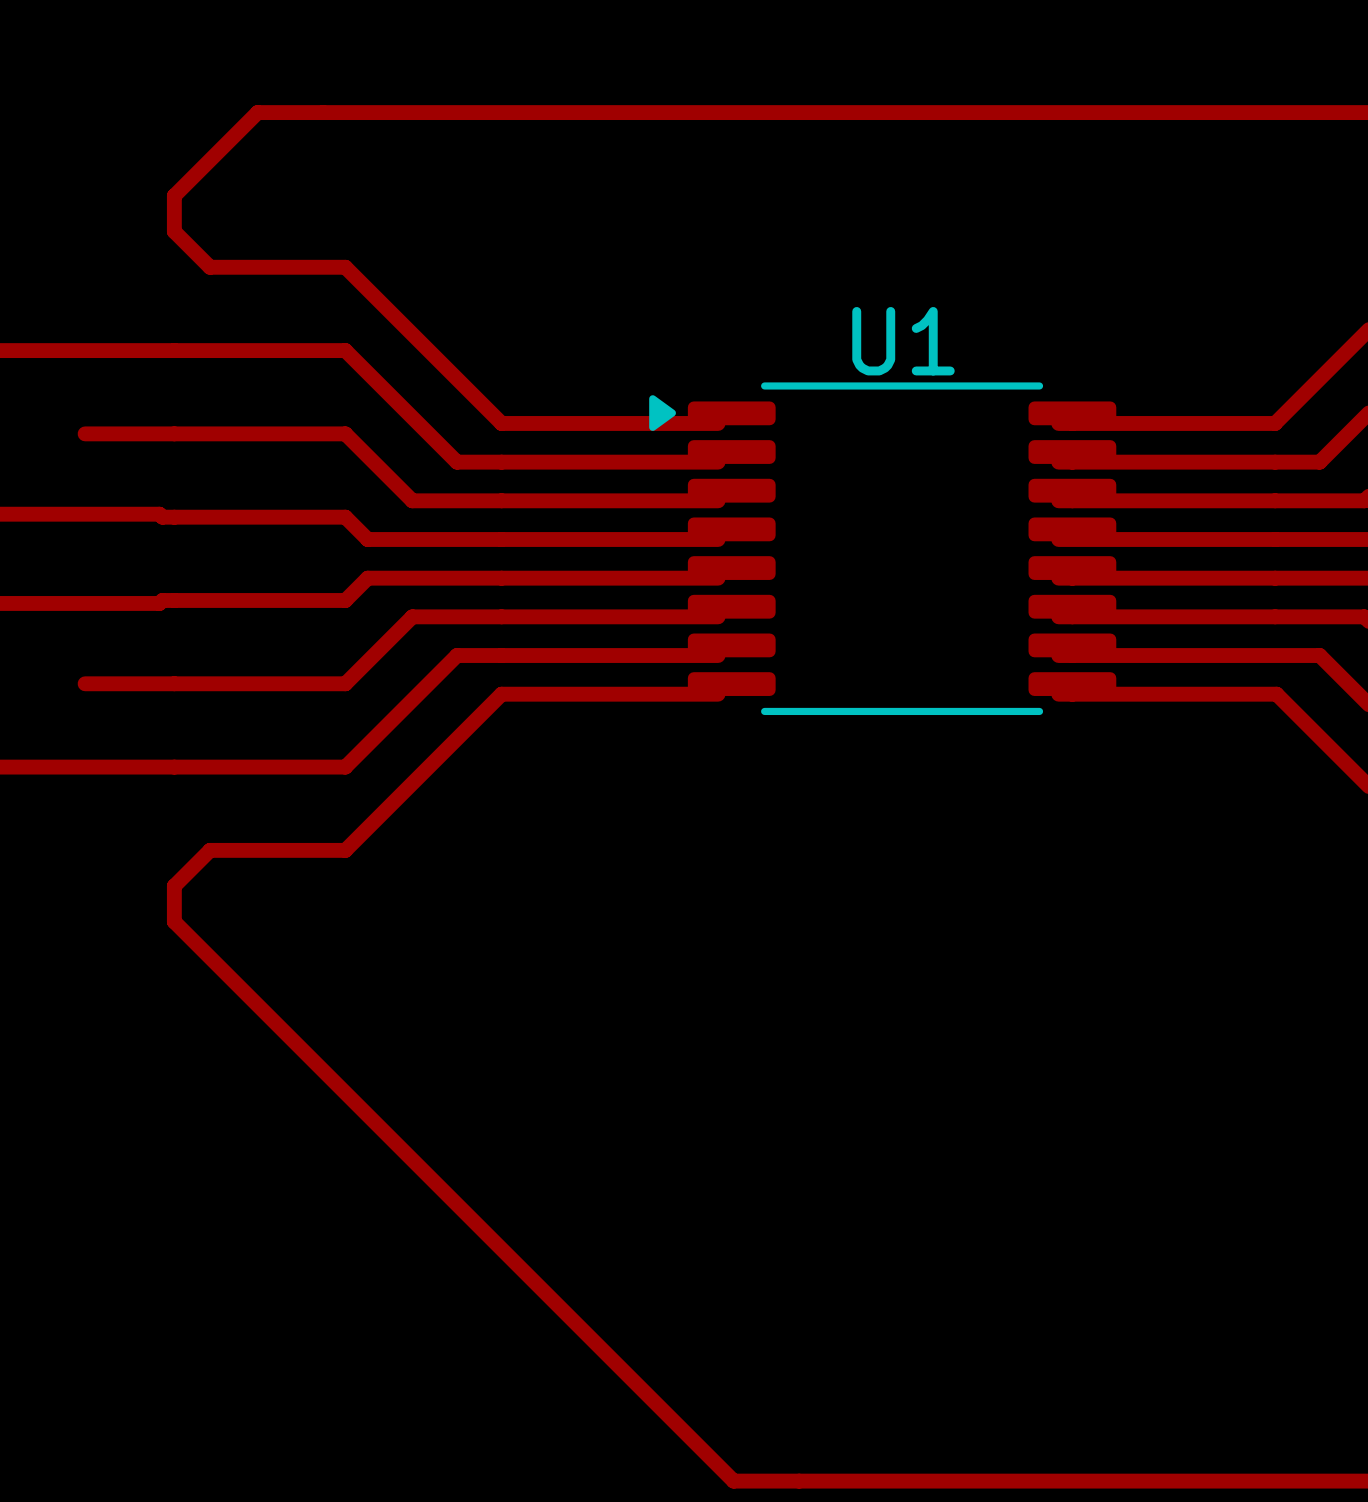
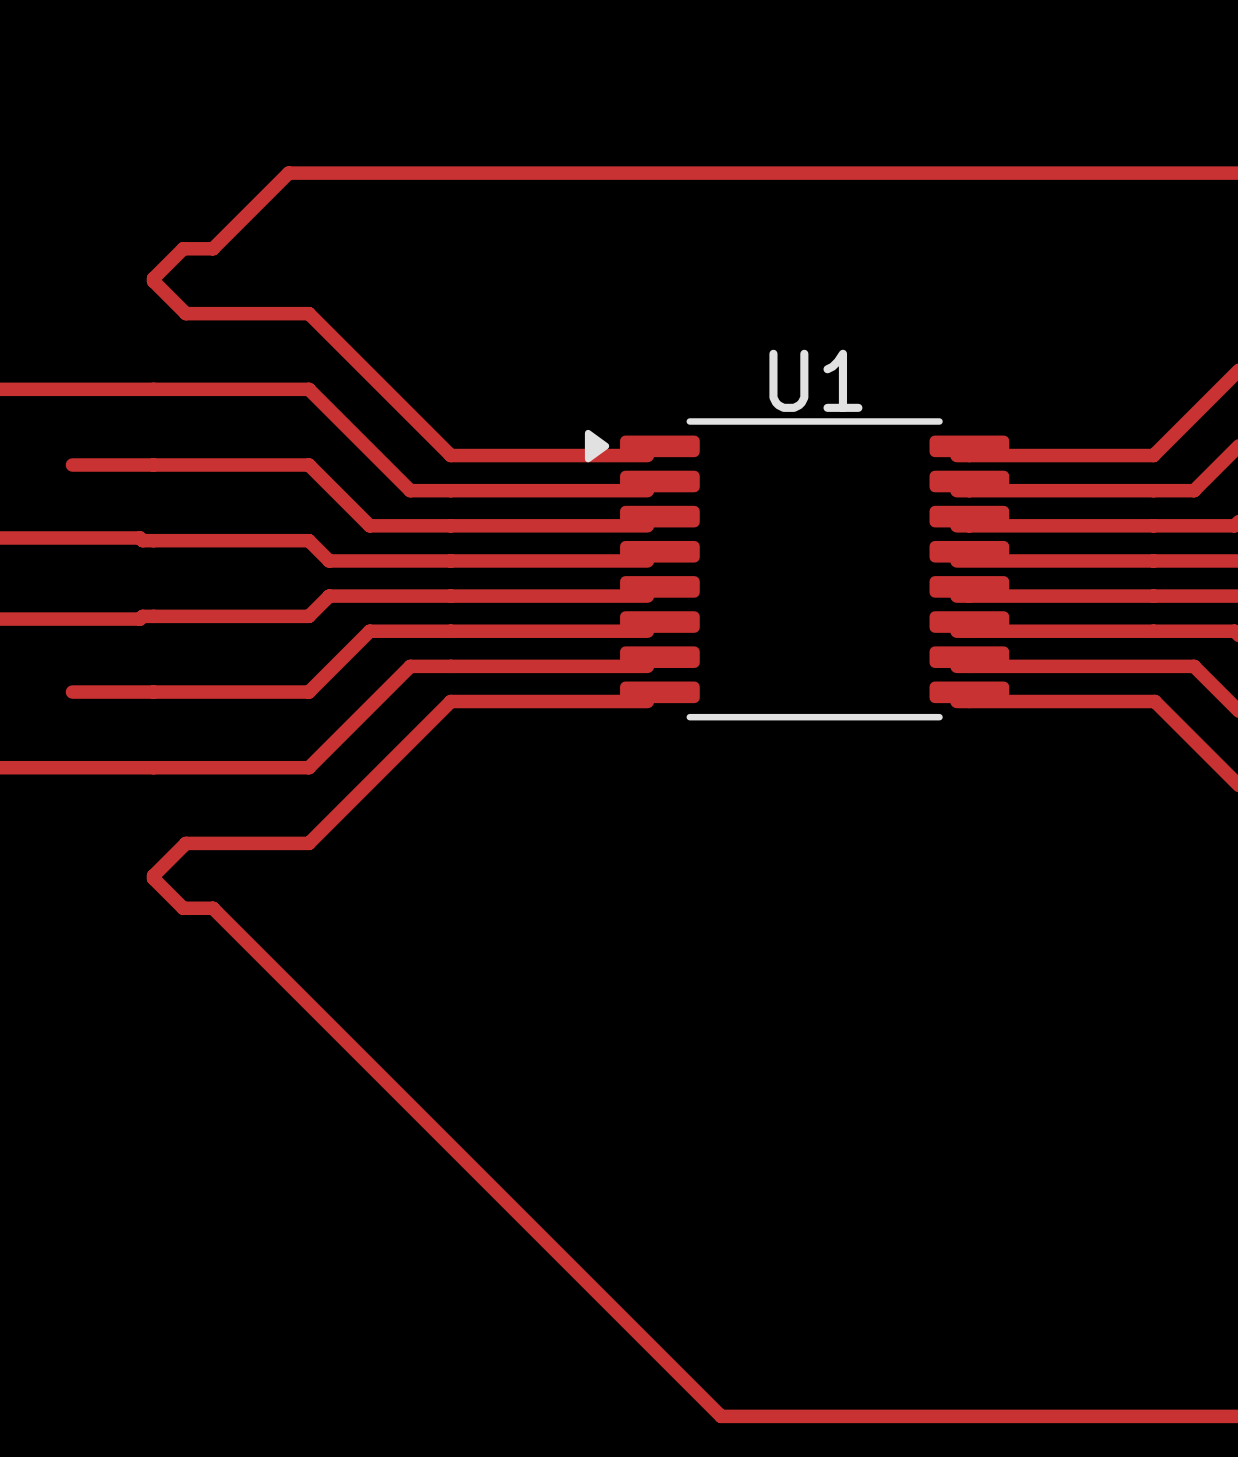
track: (323, 112) (257, 112) (174, 195) (174, 228) -> (288, 173) (213, 248) (183, 248) (153, 278)
track: (174, 889) (174, 921) (733, 1481) (799, 1481) -> (153, 878) (183, 908) (213, 908) (721, 1416)

